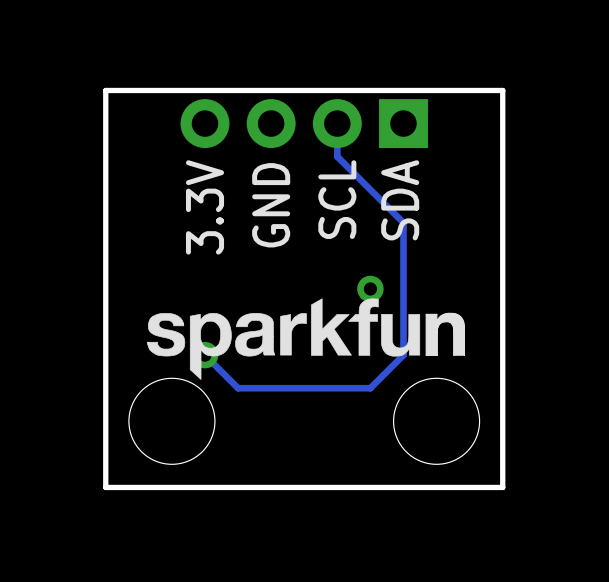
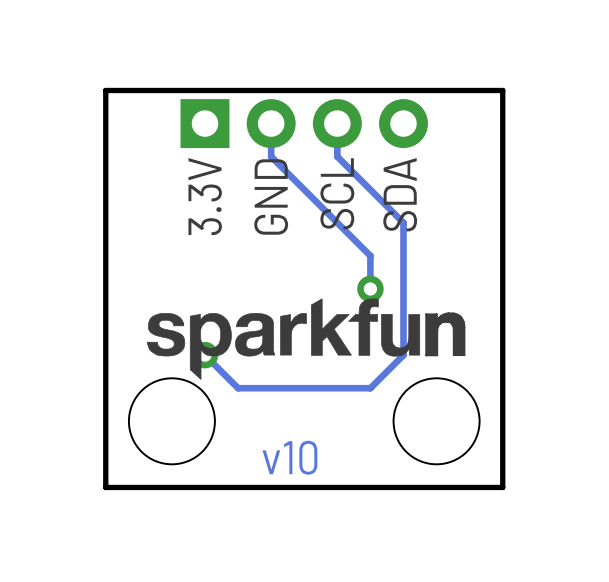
track: none -> (271, 123) (271, 156) (370, 255) (370, 288)
part rotation: 0° (304, 123) -> 180° (304, 123)
text: none -> v10 (289, 457)

